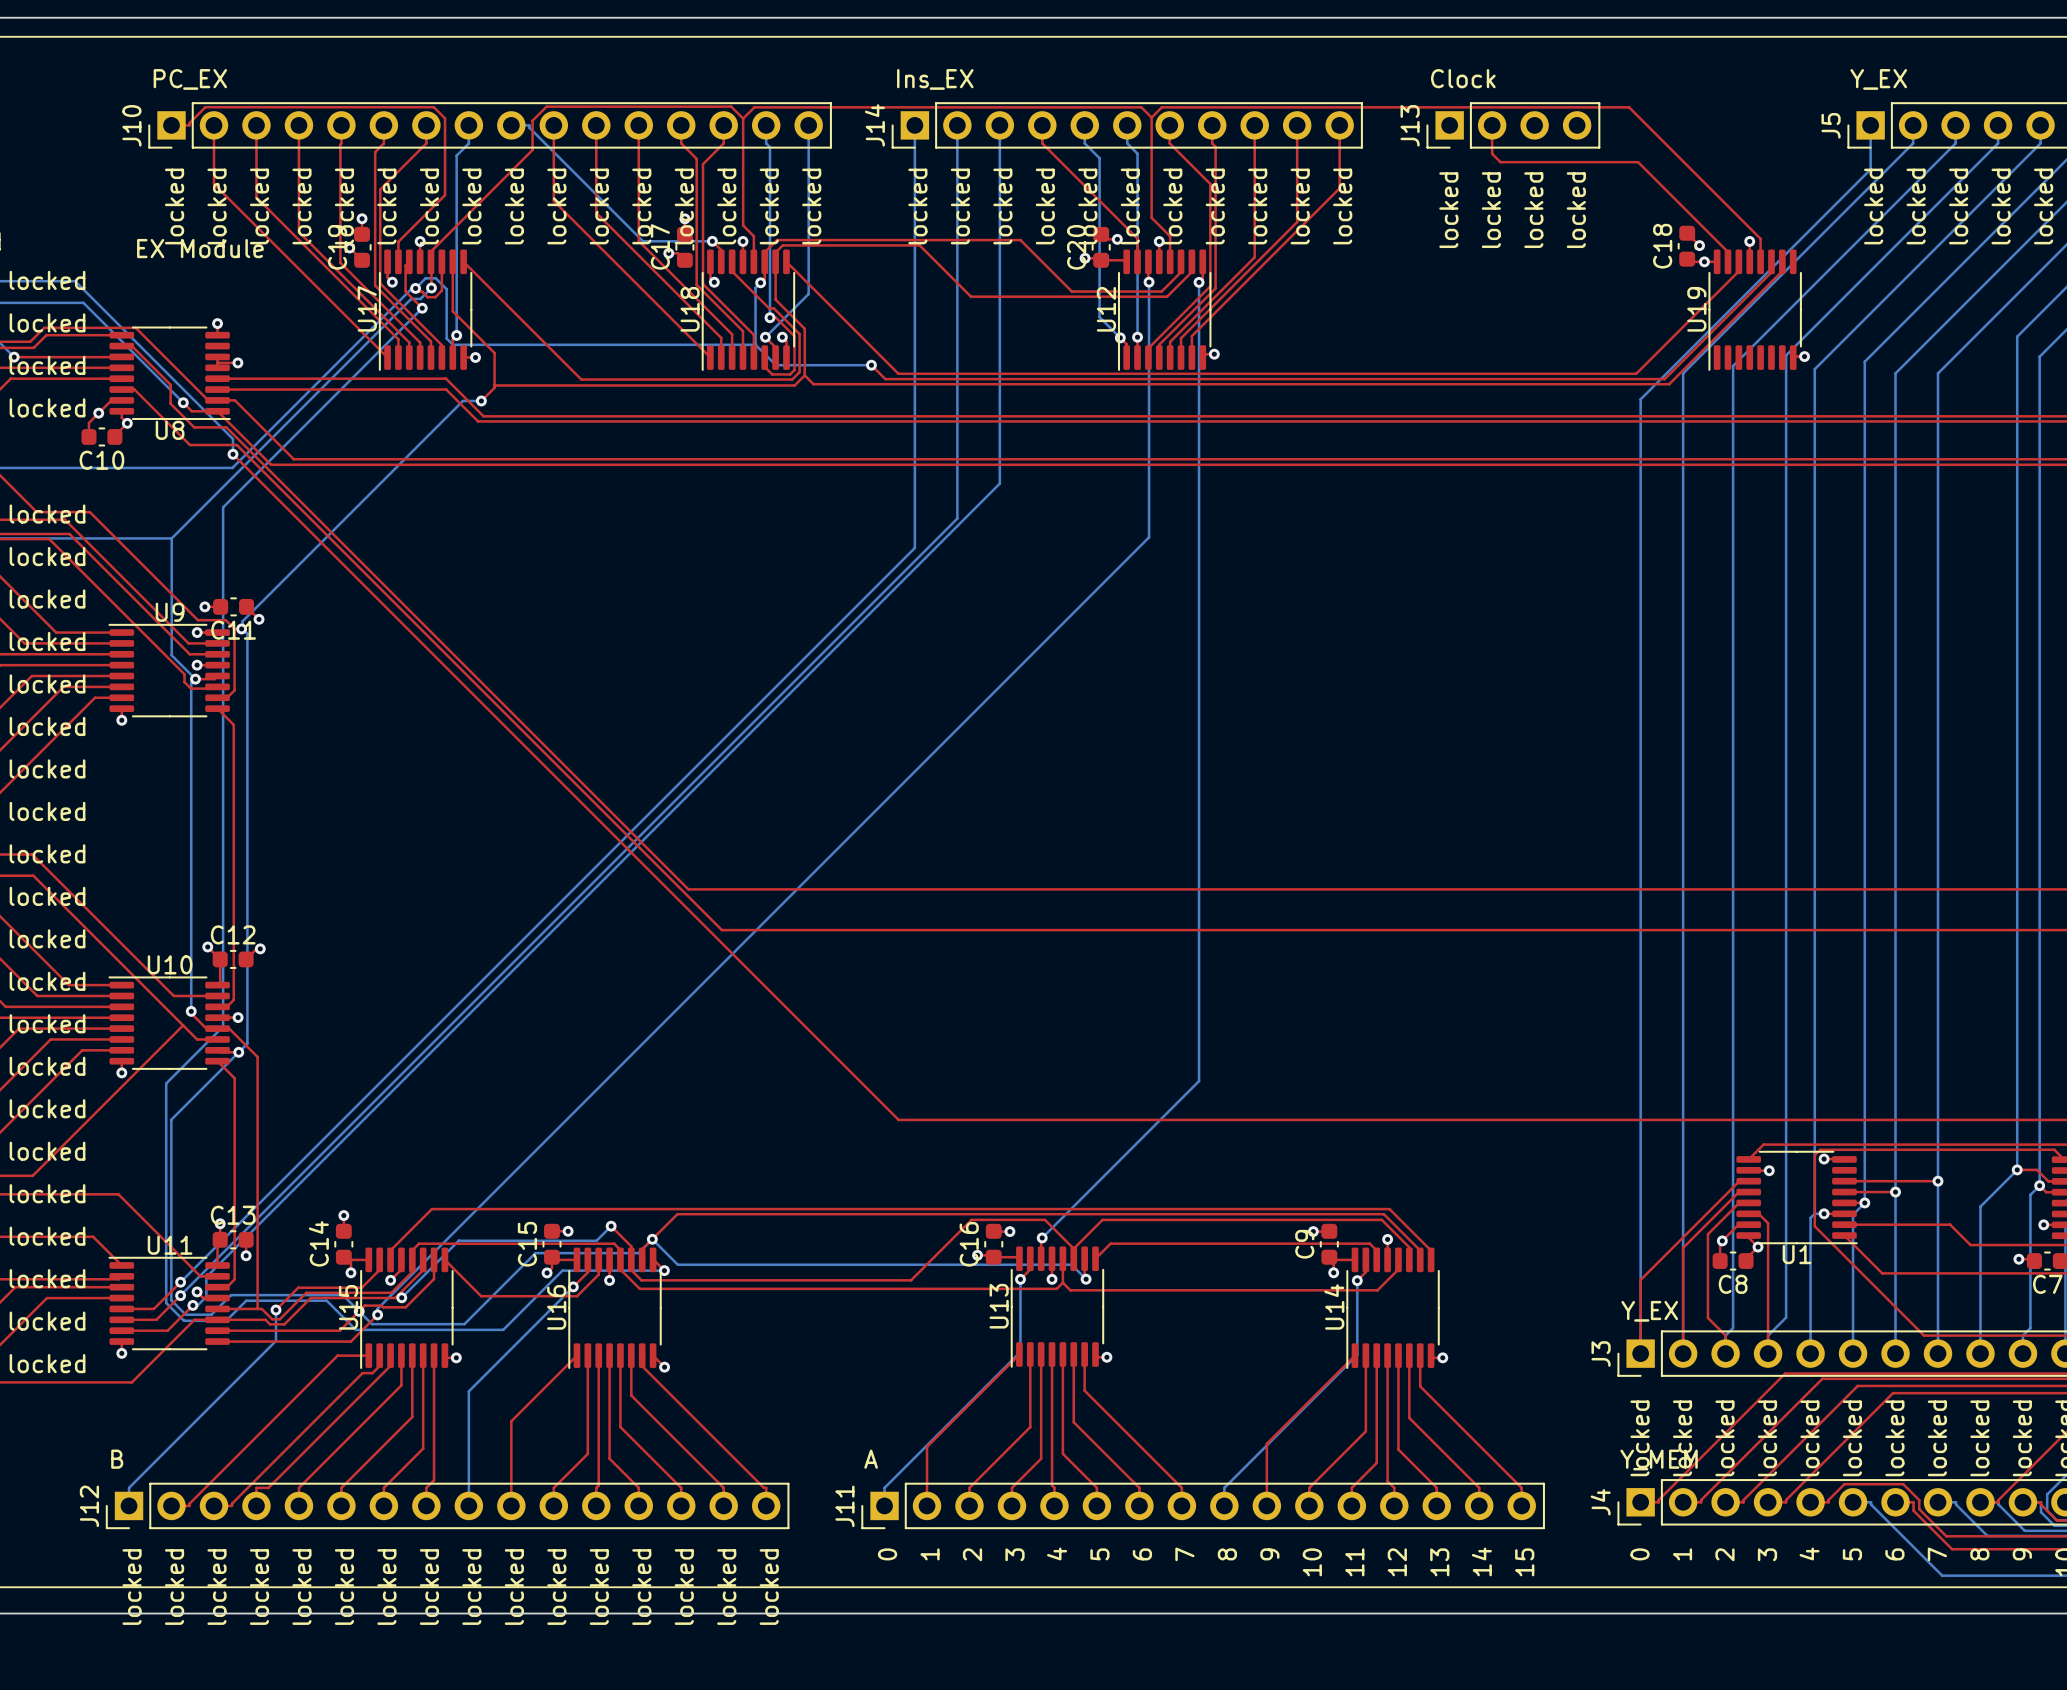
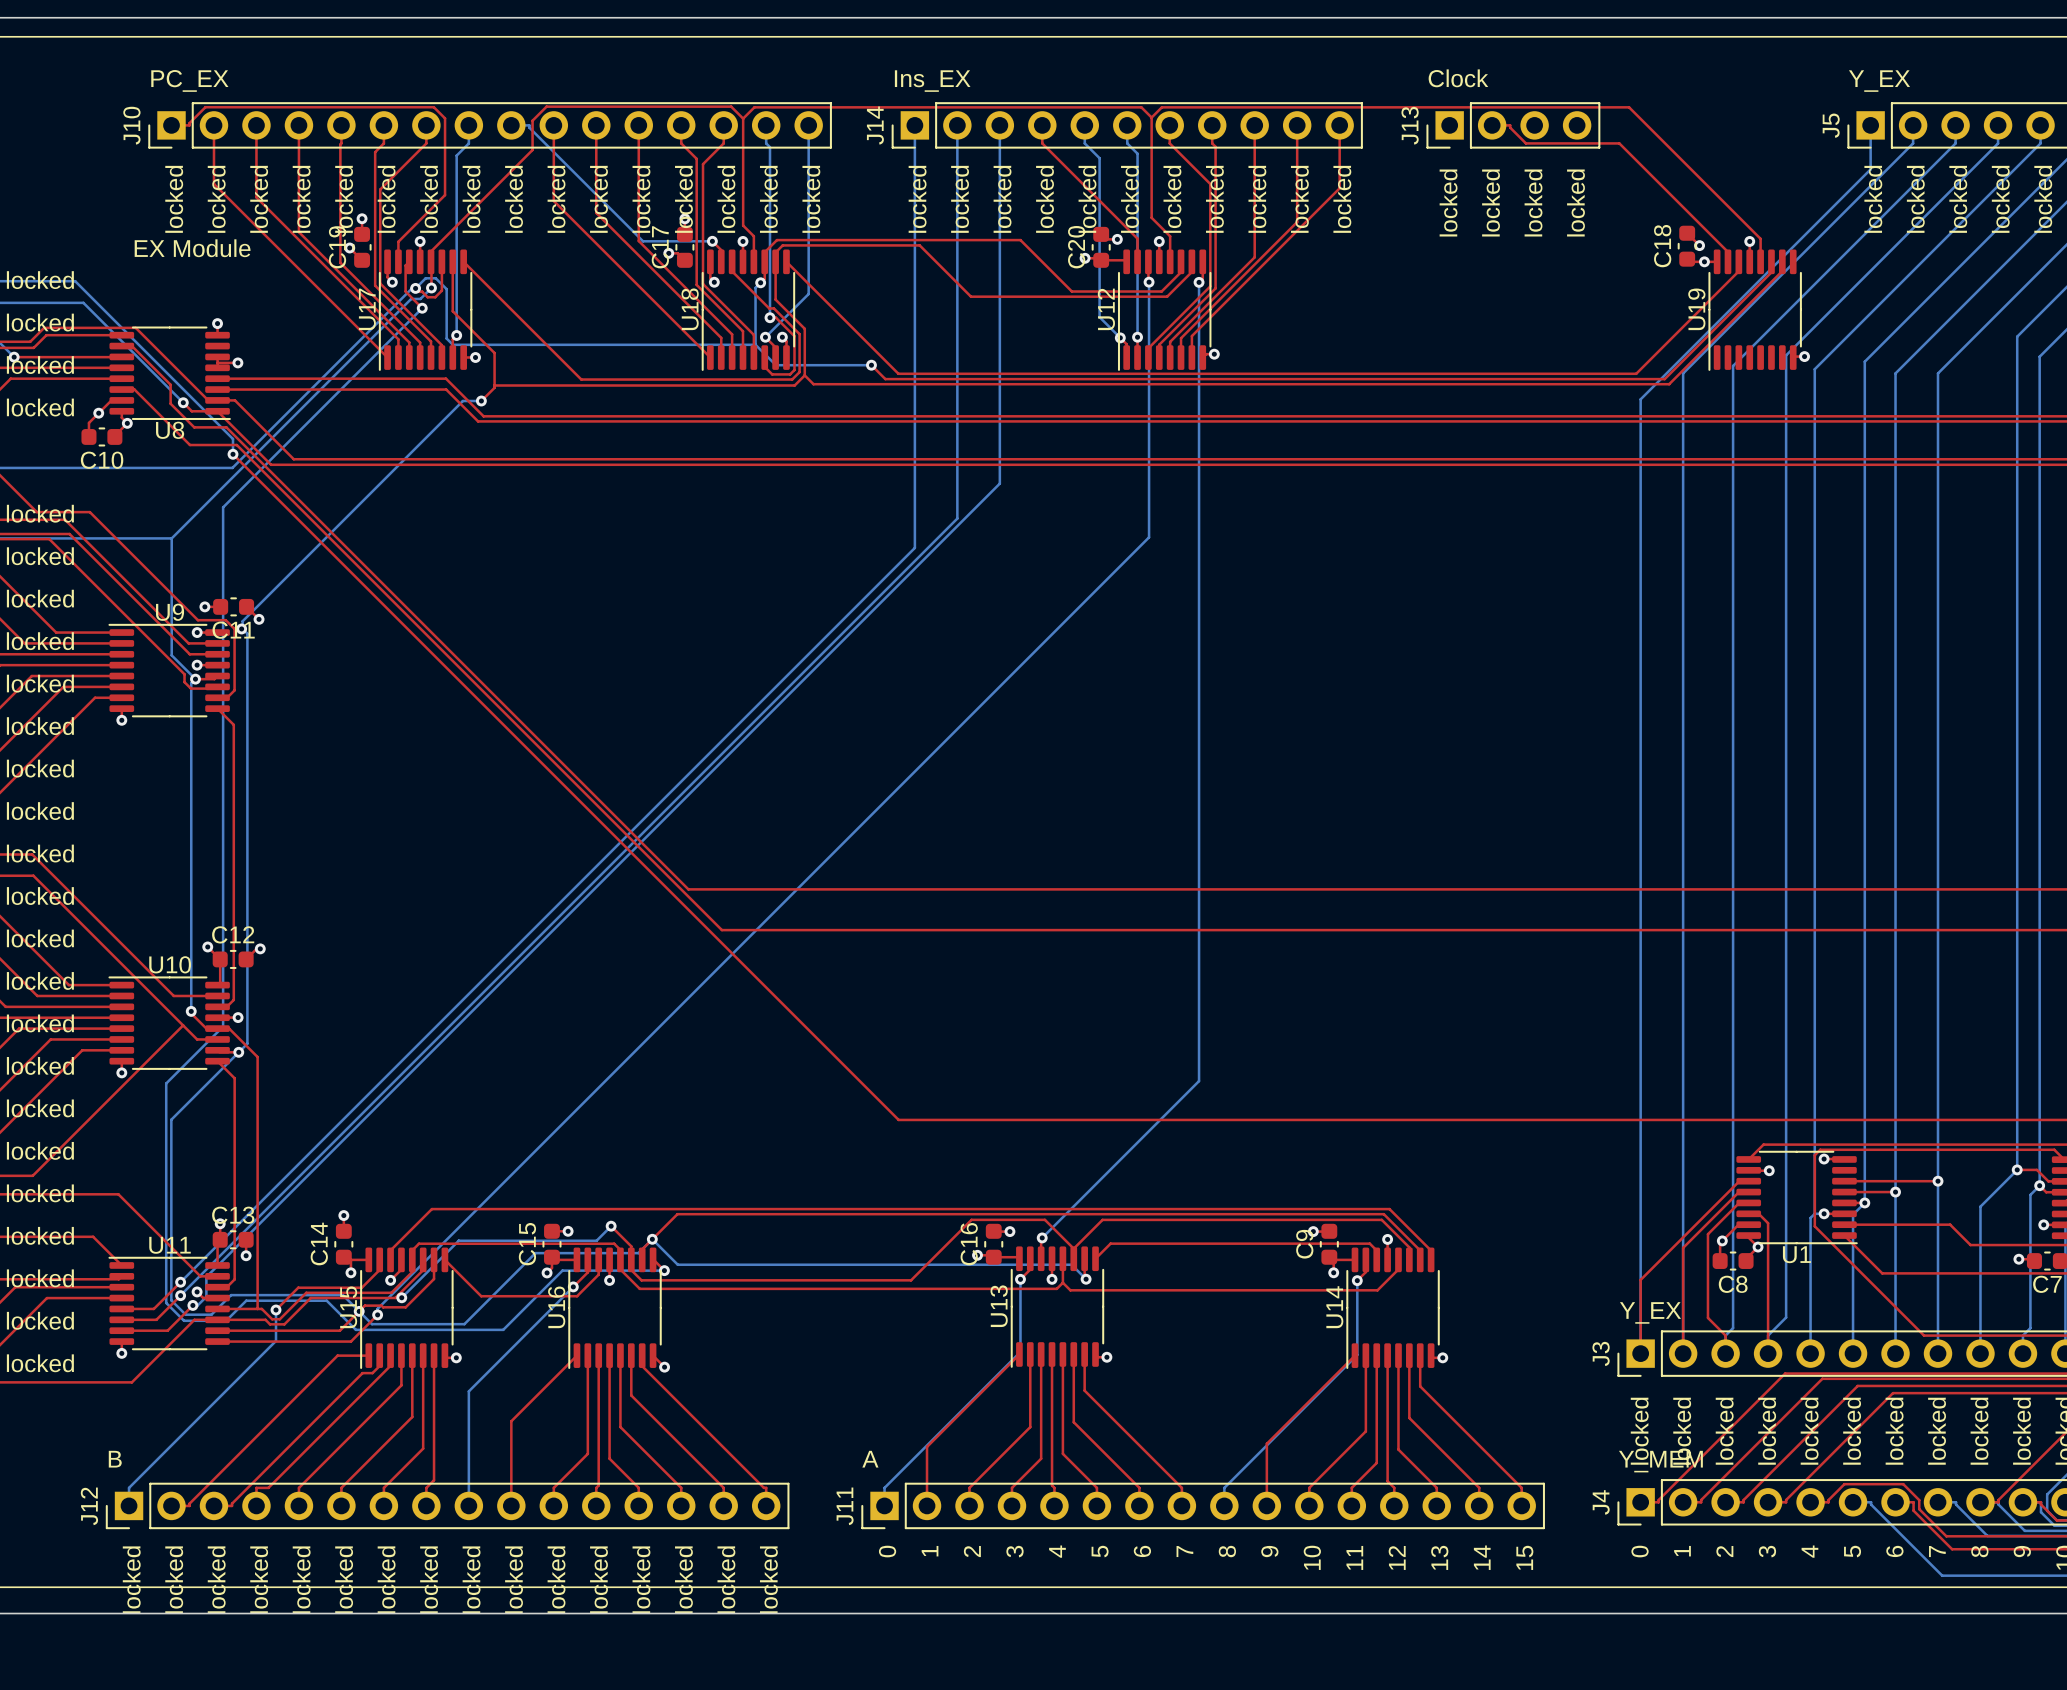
top track: (1492, 125) (1492, 153) (1500, 162) (1638, 162) -> (1492, 125) (1510, 125) (1525, 143) (1619, 143) (1638, 162)

